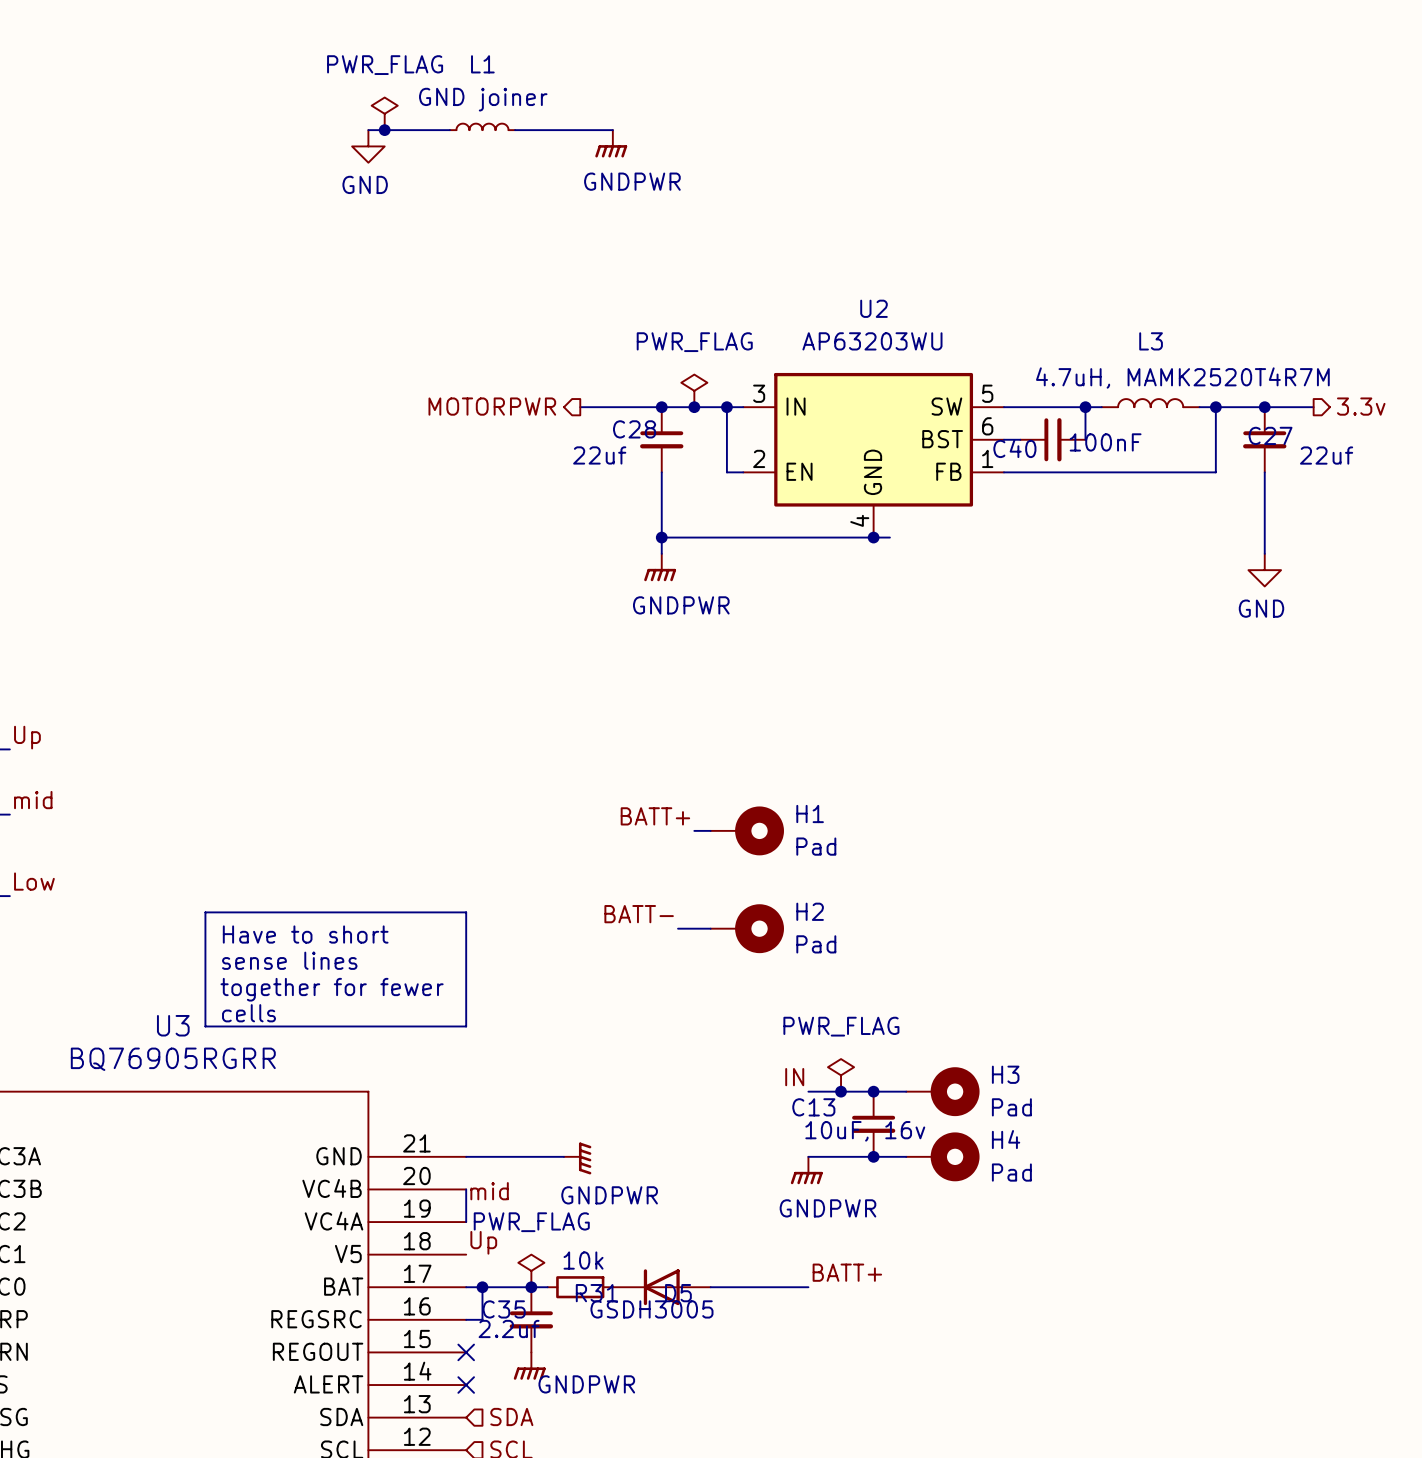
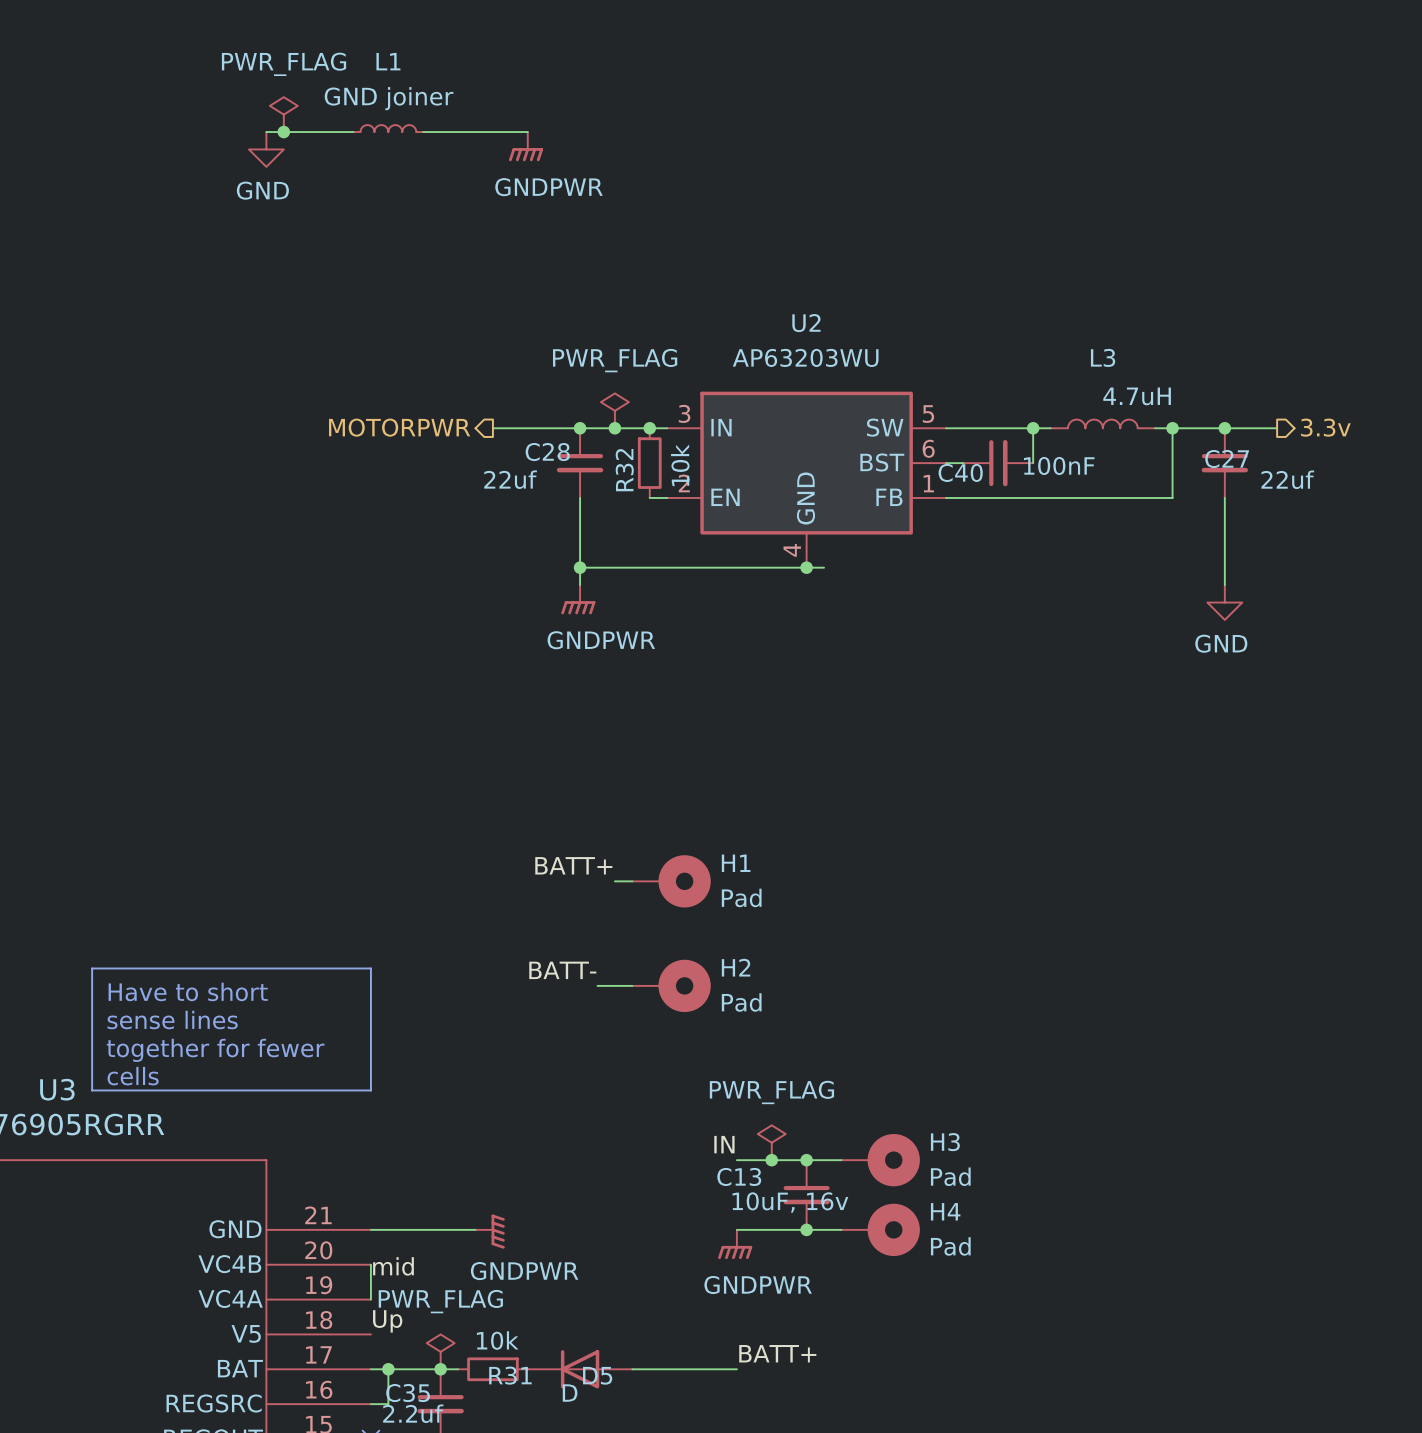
L3 value: 4.7uH, MAMK2520T4R7M (1182, 378) -> 4.7uH (1137, 396)
wire: (726, 407) (726, 472) -> none
R32: none -> 10k (649, 463)
D5 value: GSDH3005 (651, 1309) -> D (570, 1393)

